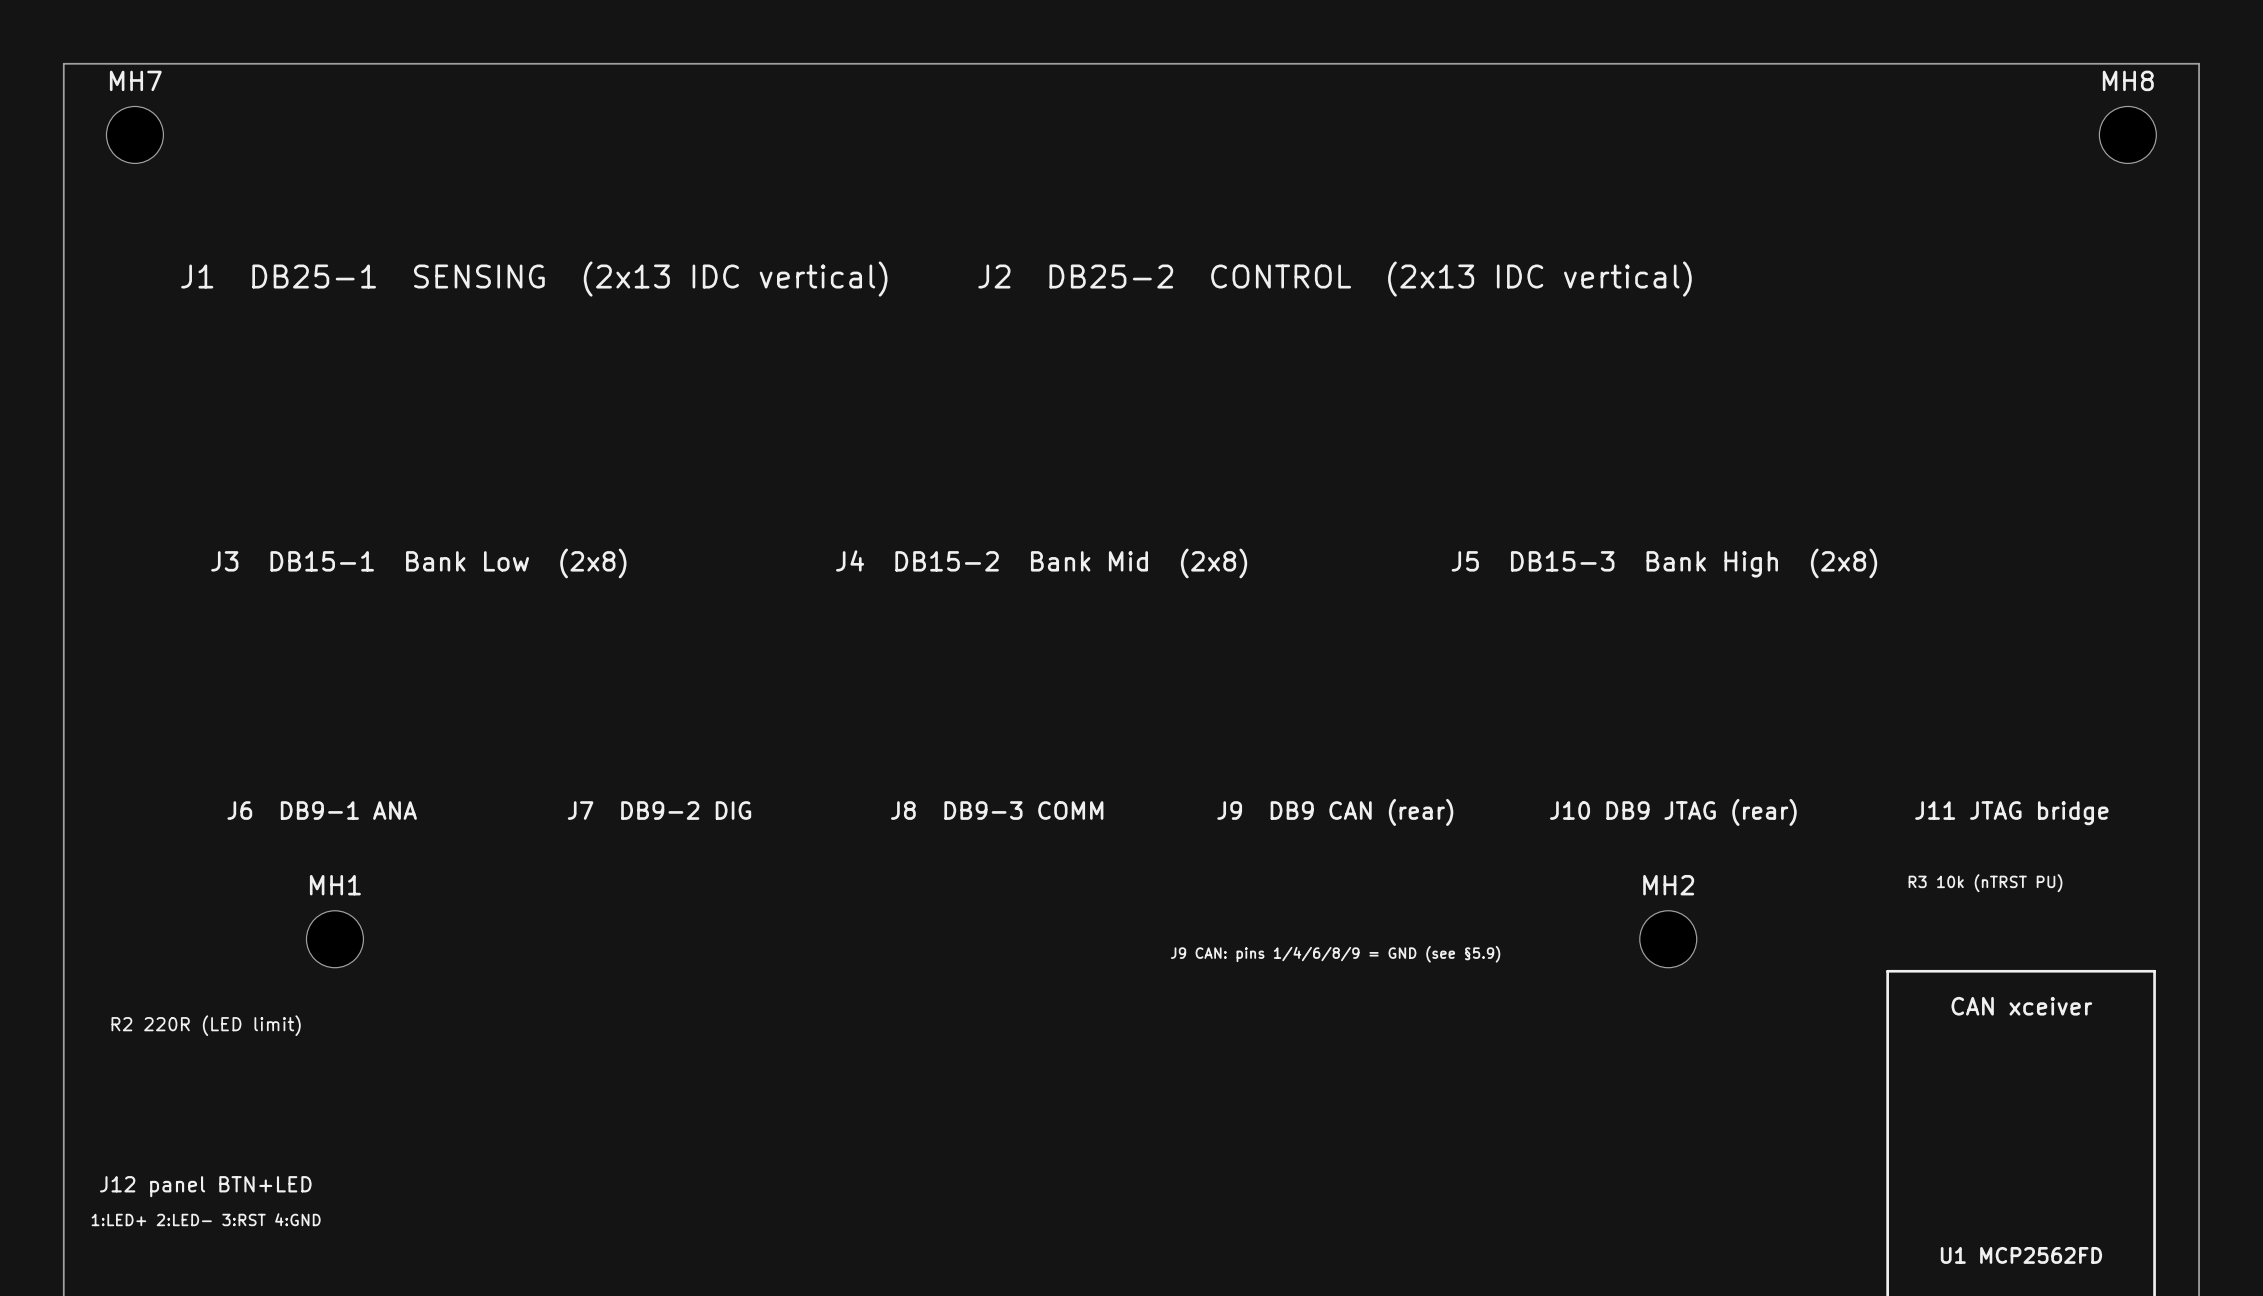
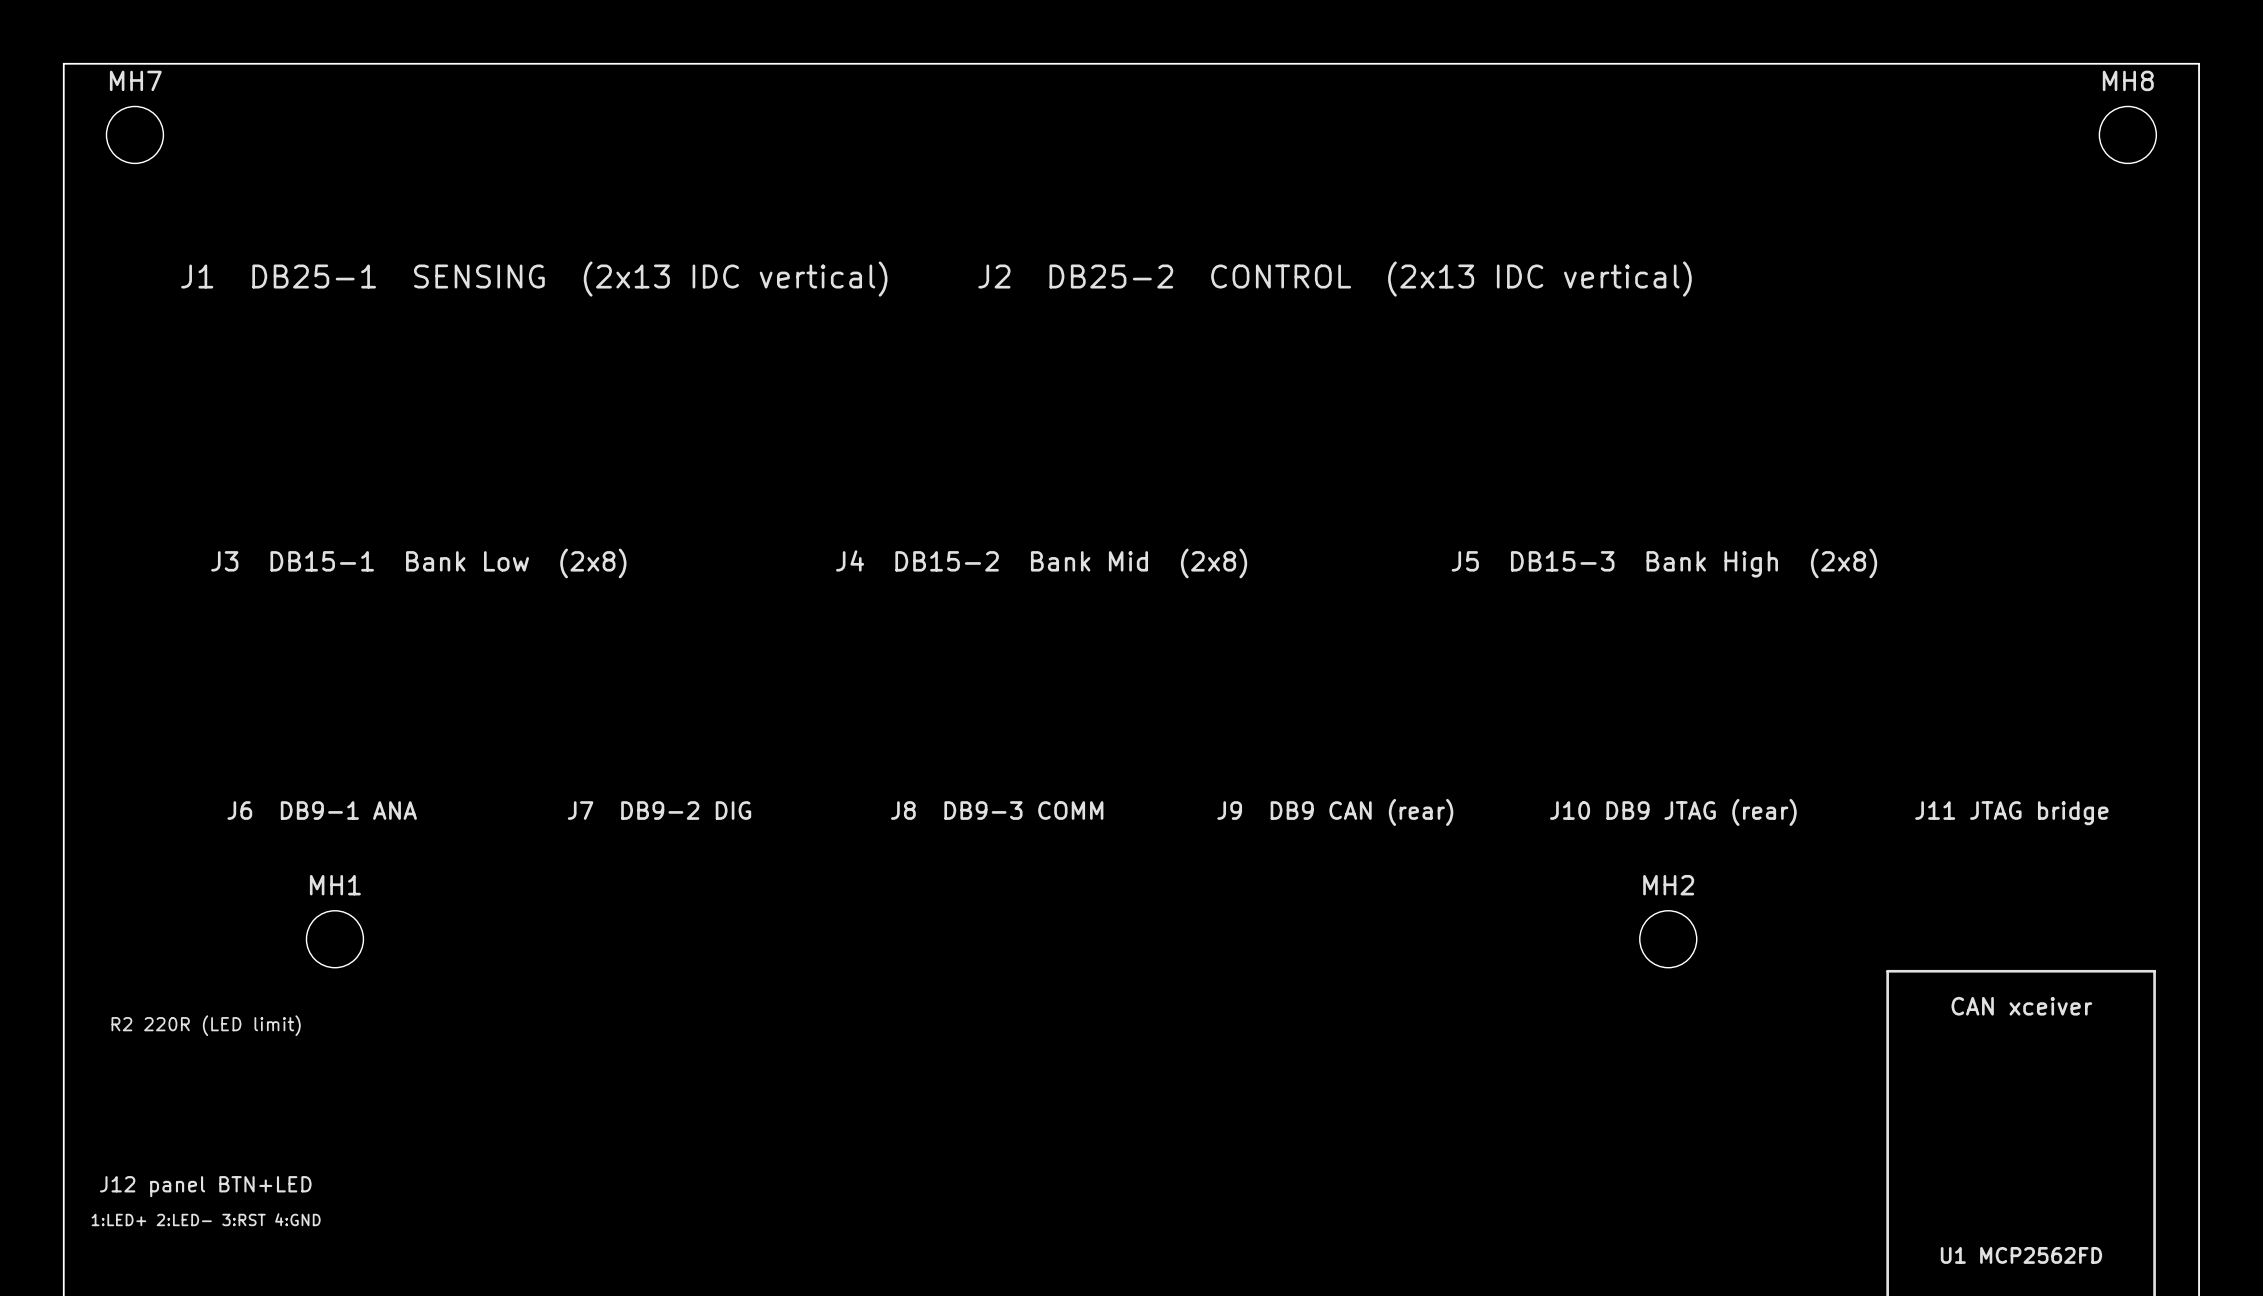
text: R3 10k (nTRST PU) (1985, 883) -> none
text: J9 CAN: pins 1/4/6/8/9 = GND (see §5.9) (1335, 954) -> none

